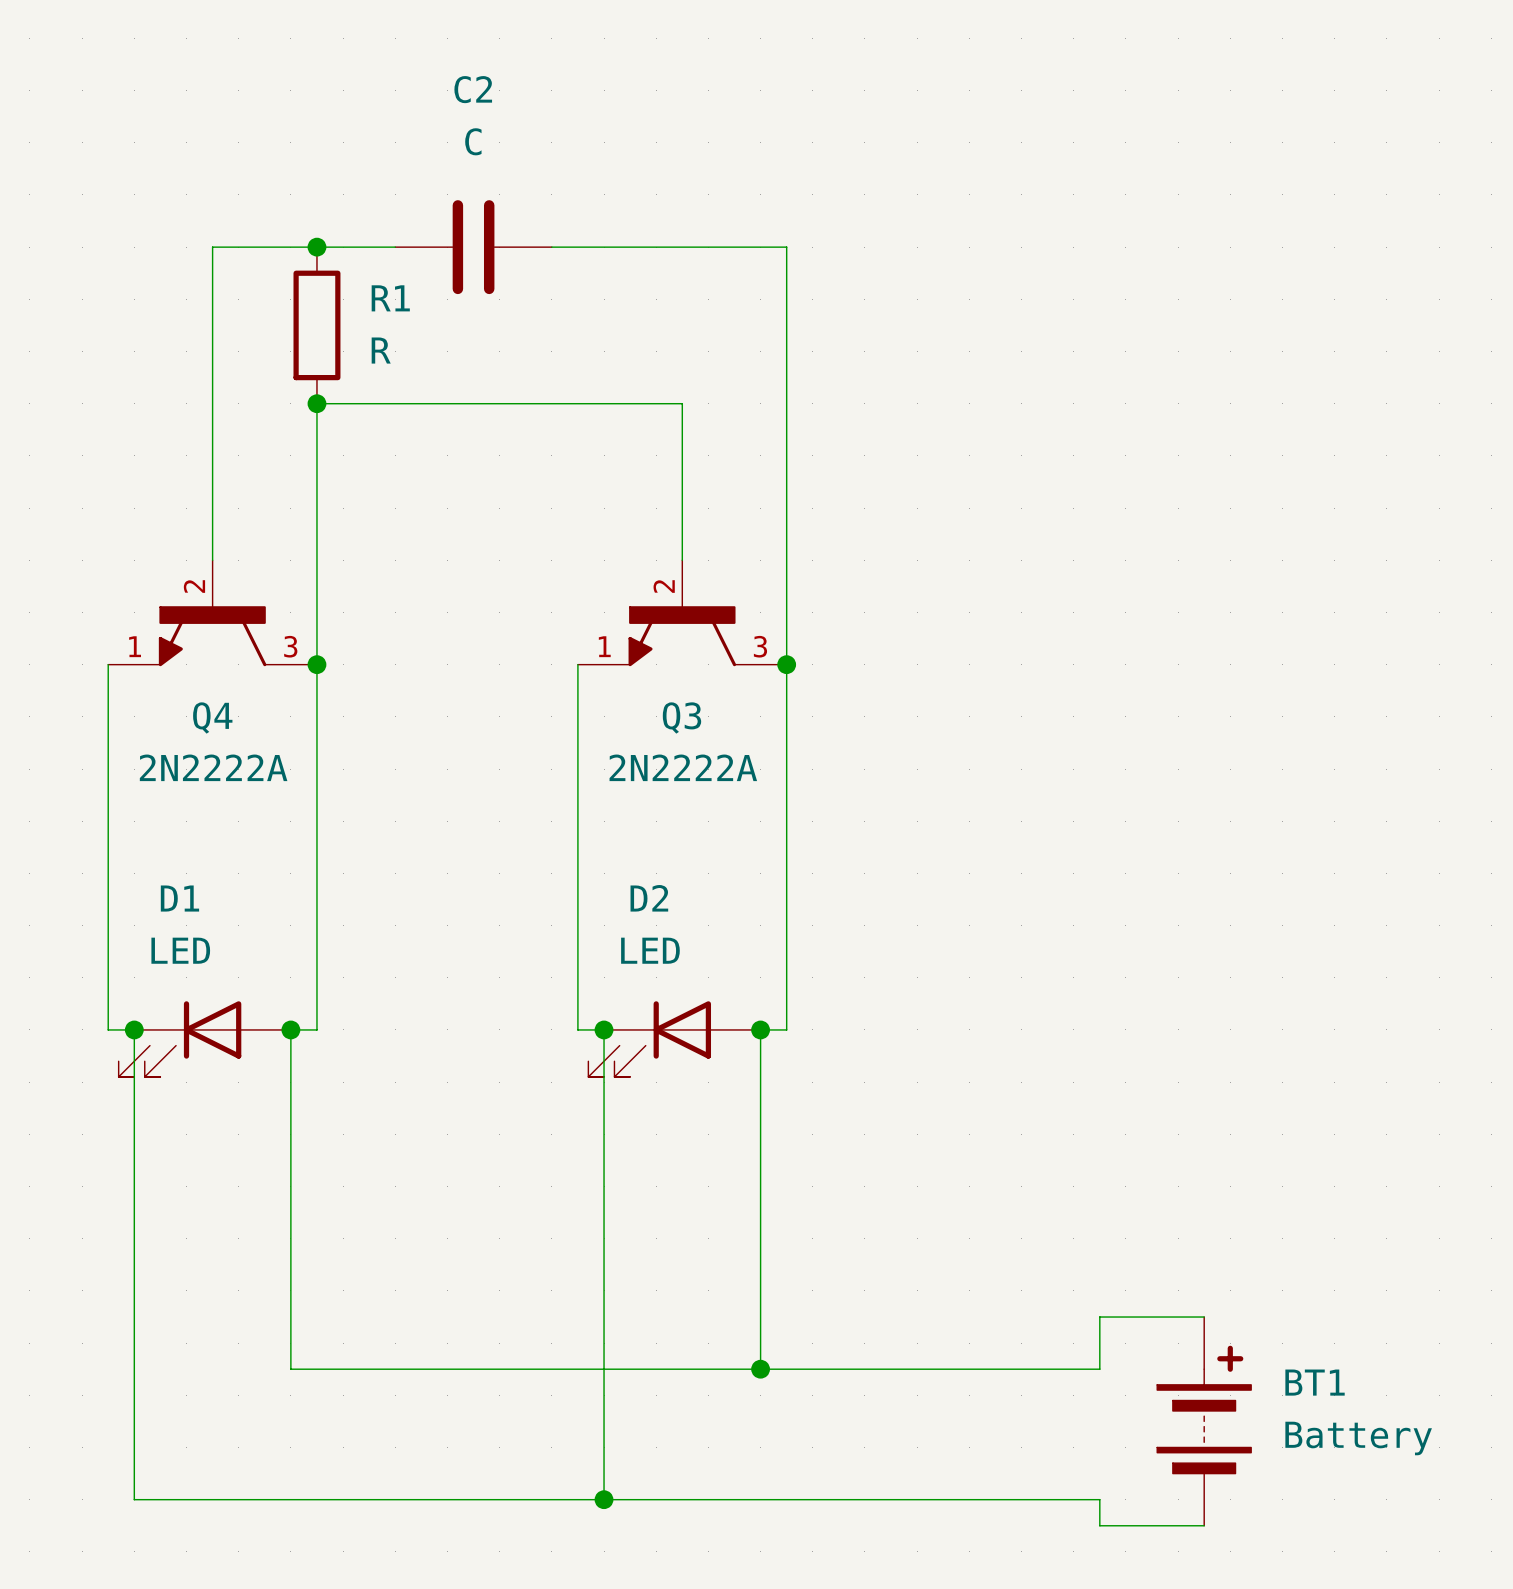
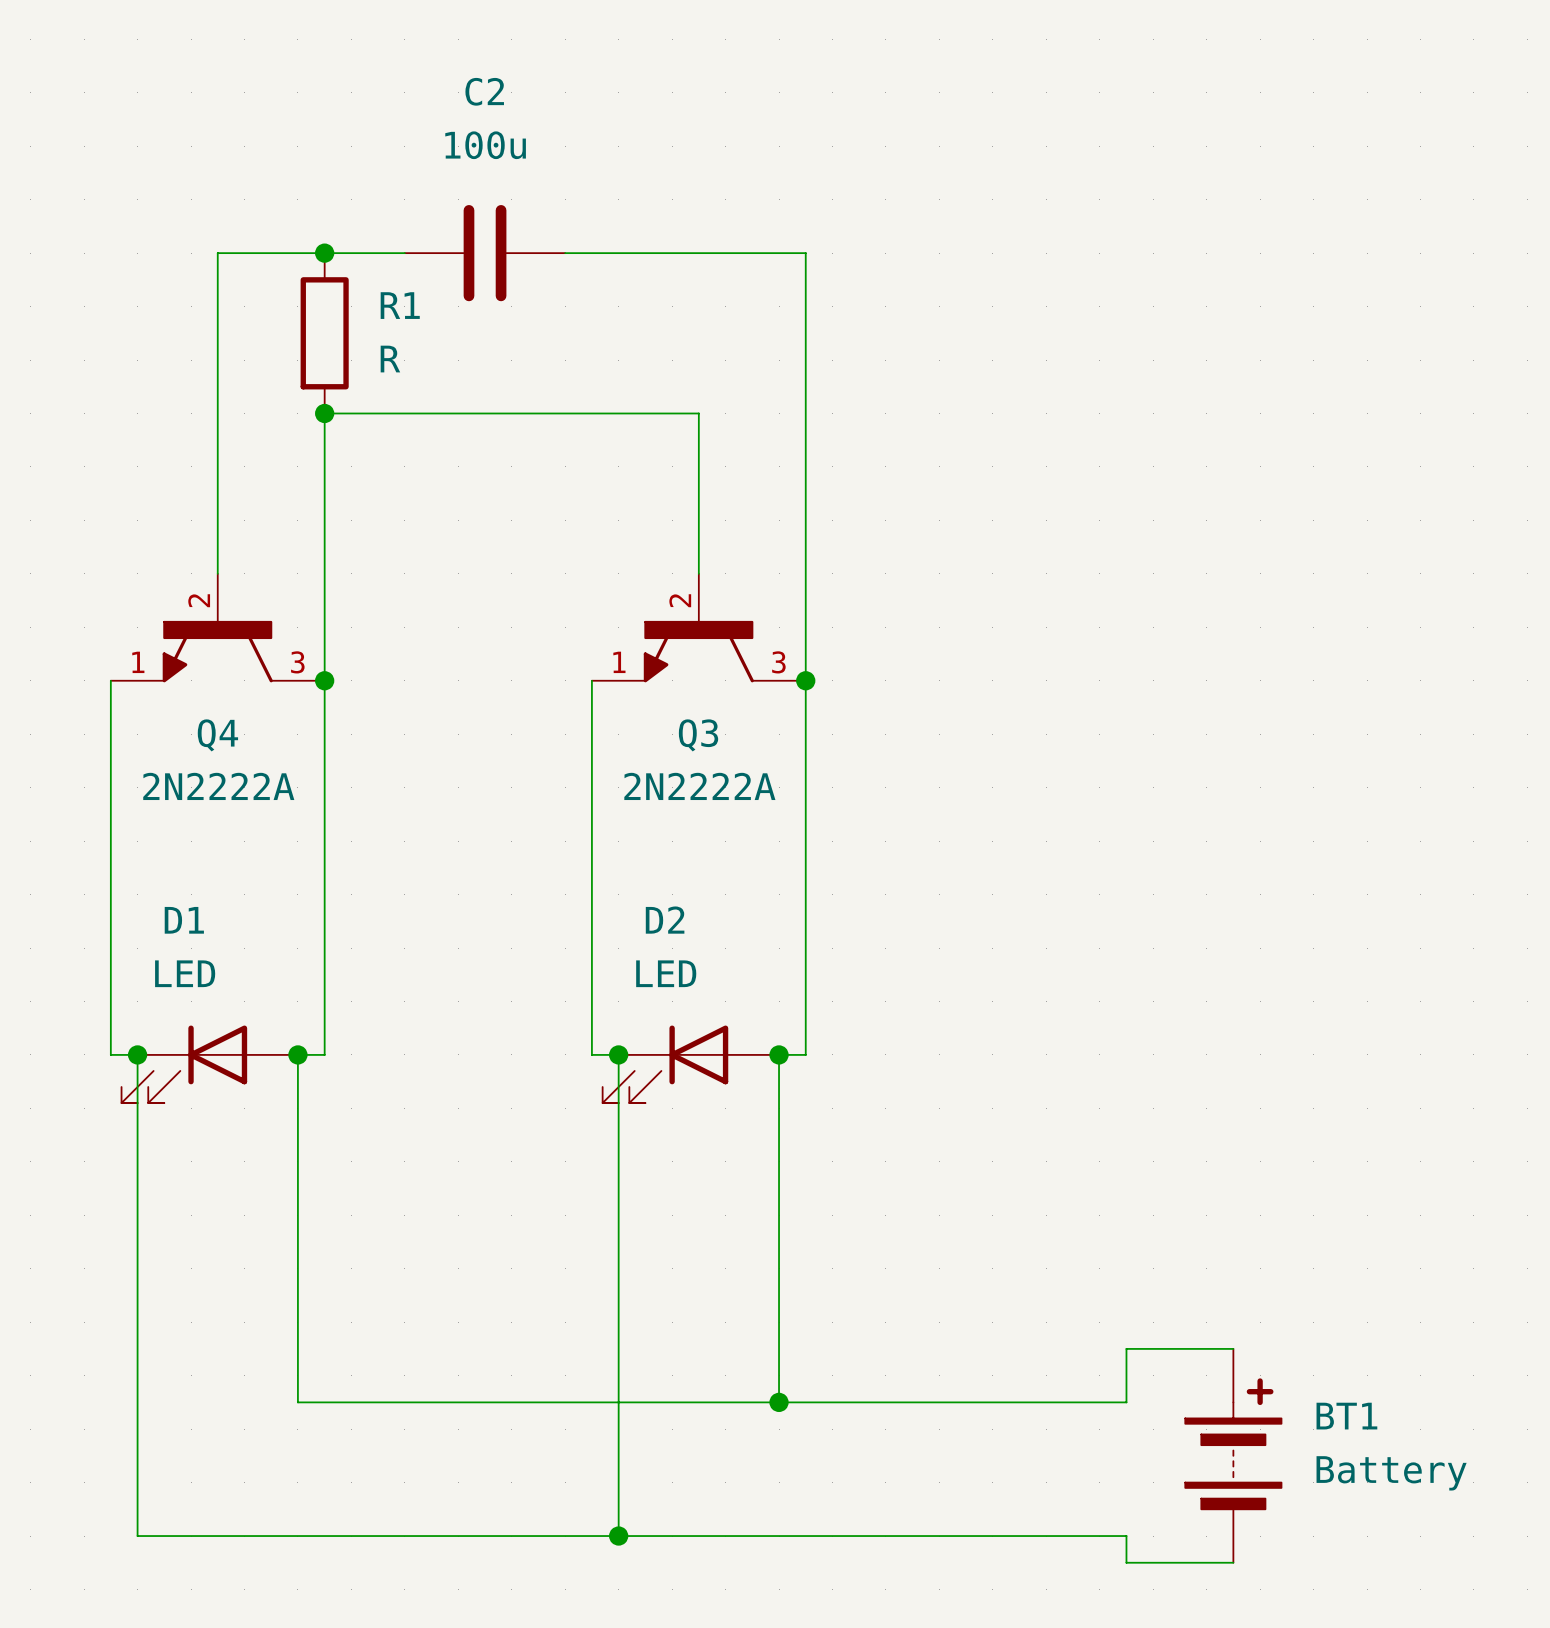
C2 value: C (473, 141) -> 100u (485, 145)

